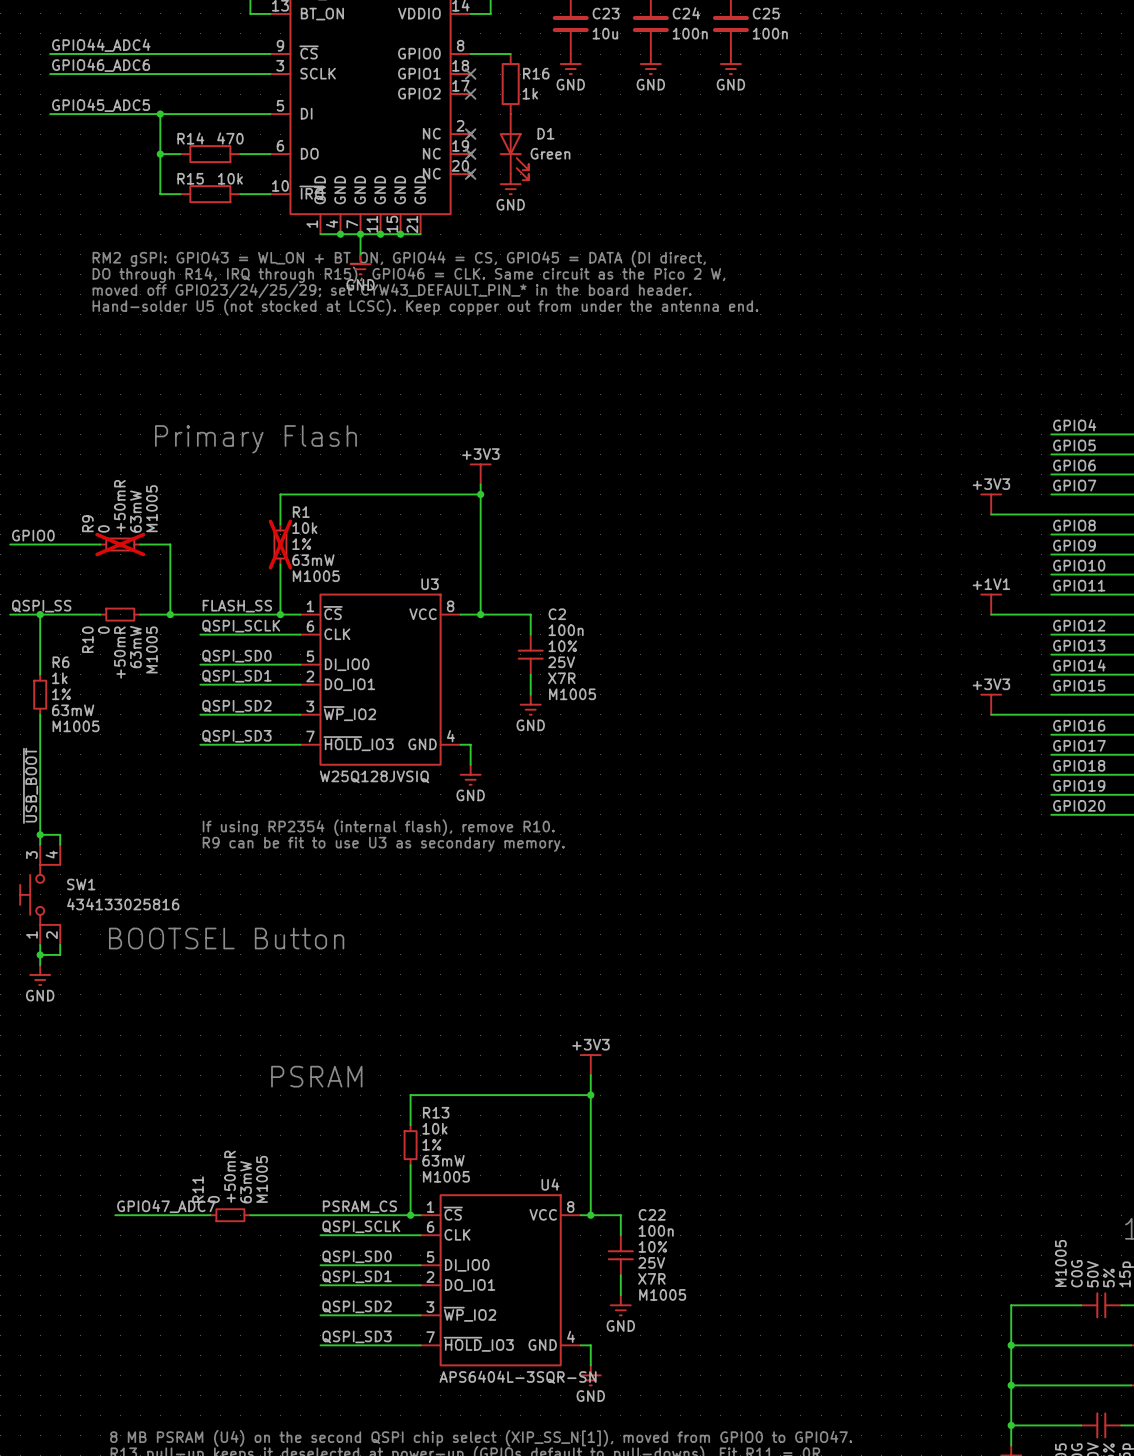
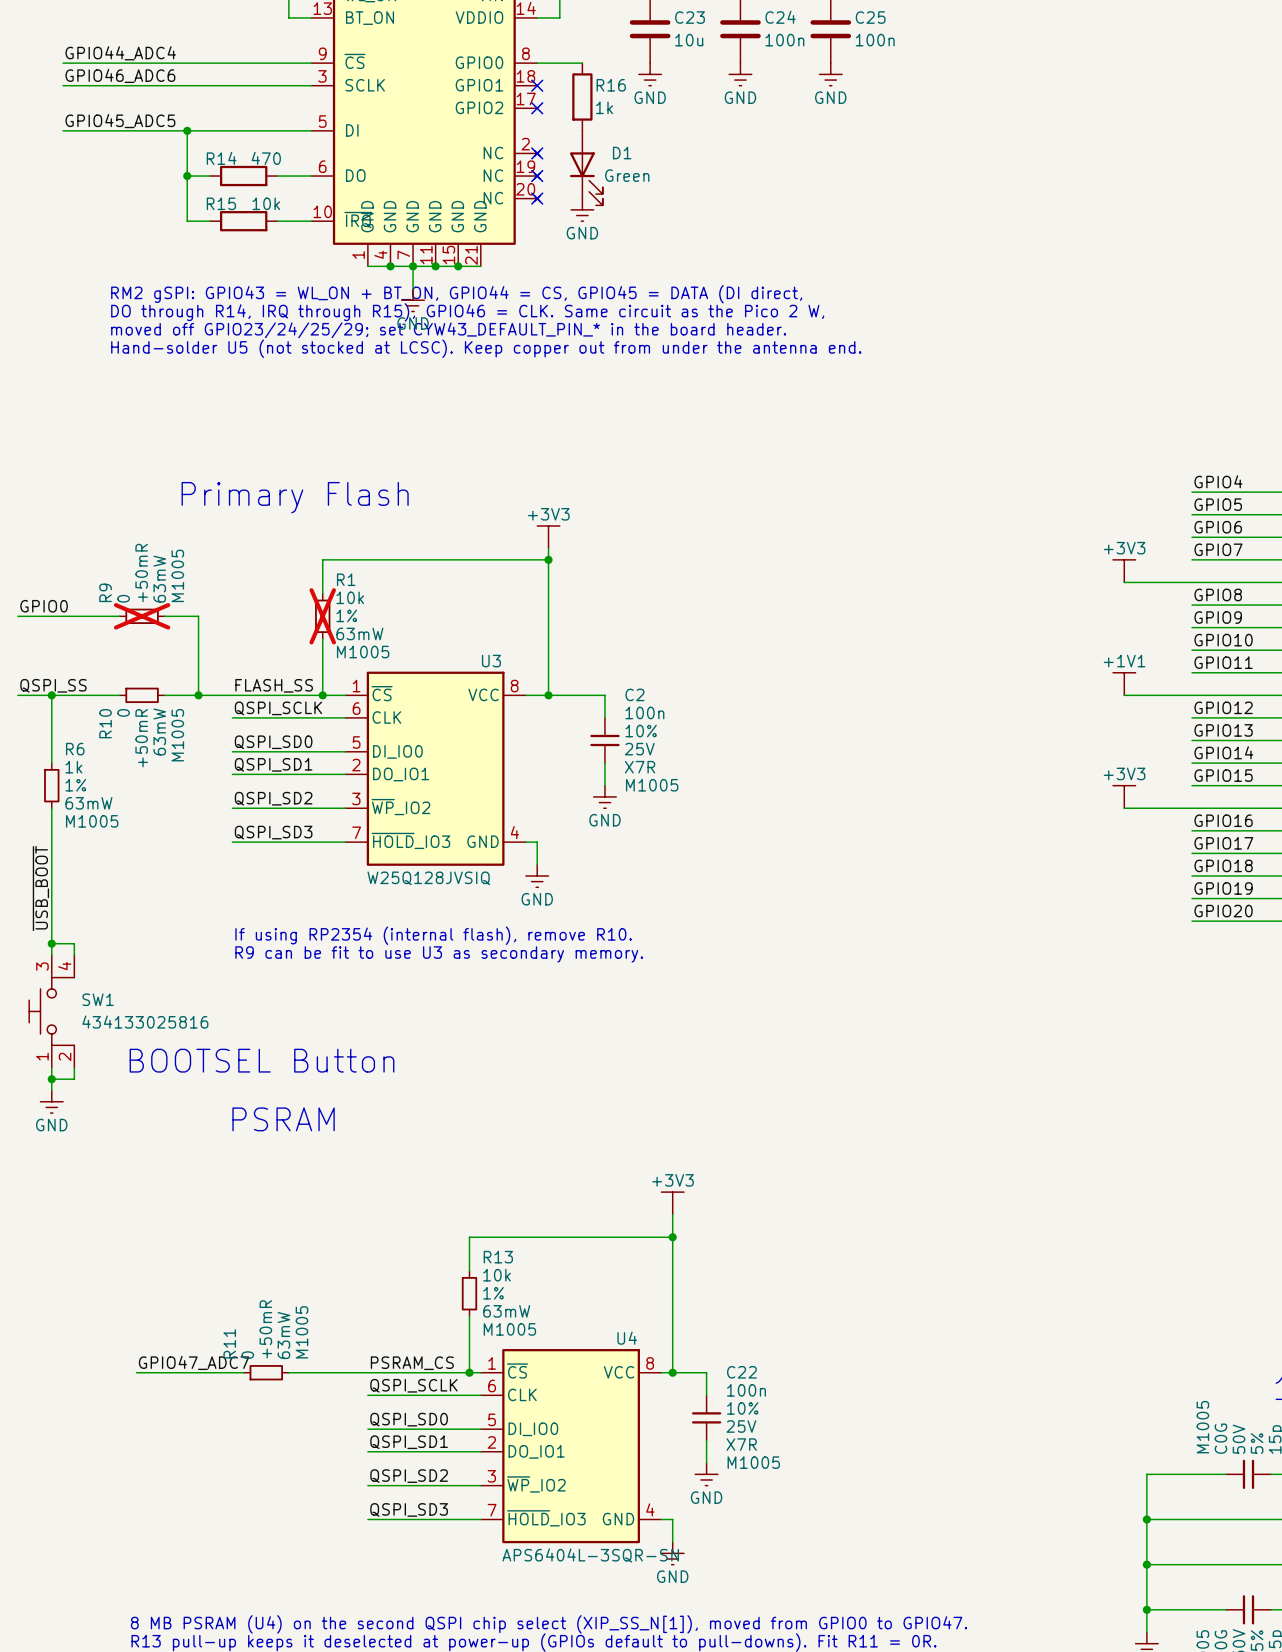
text position: PSRAM (316, 1076) -> PSRAM (283, 1119)

